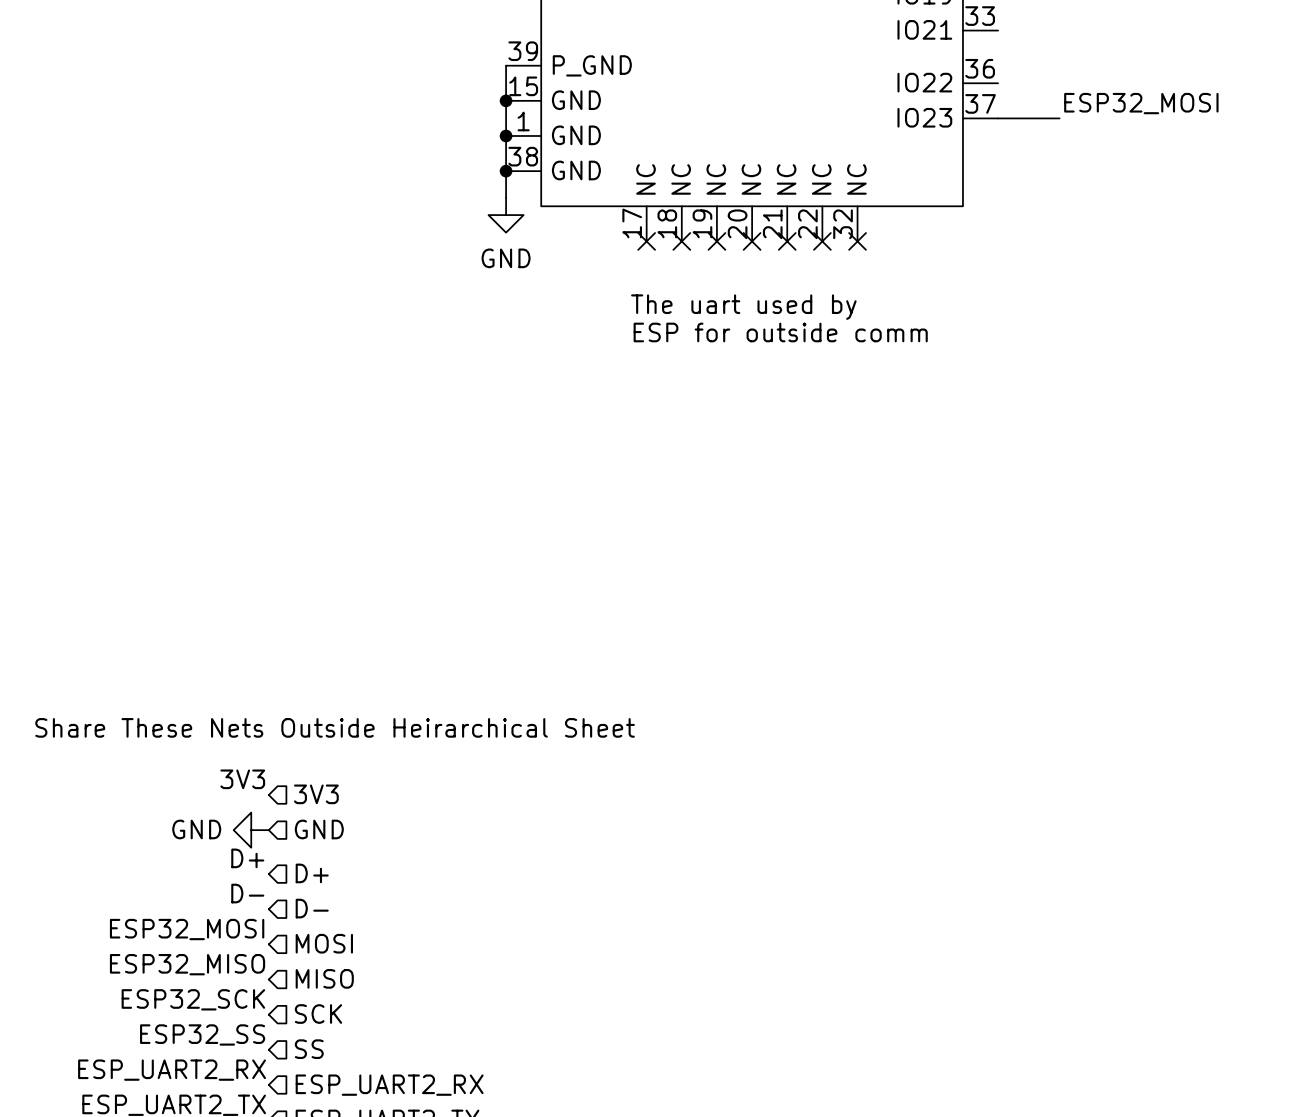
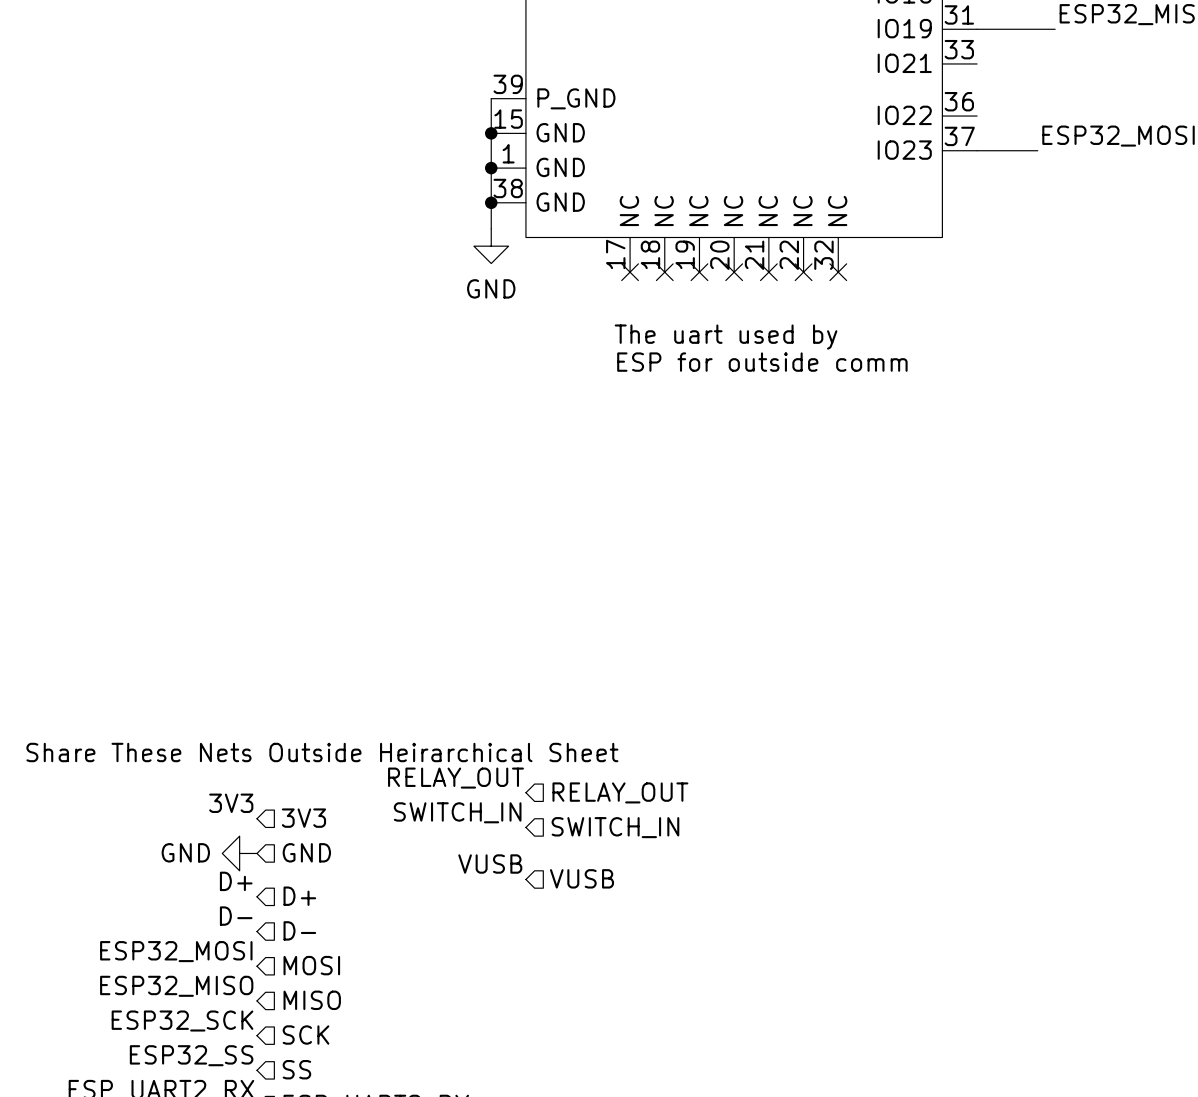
label: none -> RELAY_OUT (456, 778)
hierarchical label: none -> RELAY_OUT (620, 792)
label: none -> SWITCH_IN (457, 812)
hierarchical label: none -> SWITCH_IN (615, 827)
label: none -> VUSB (490, 864)
hierarchical label: none -> VUSB (581, 878)

